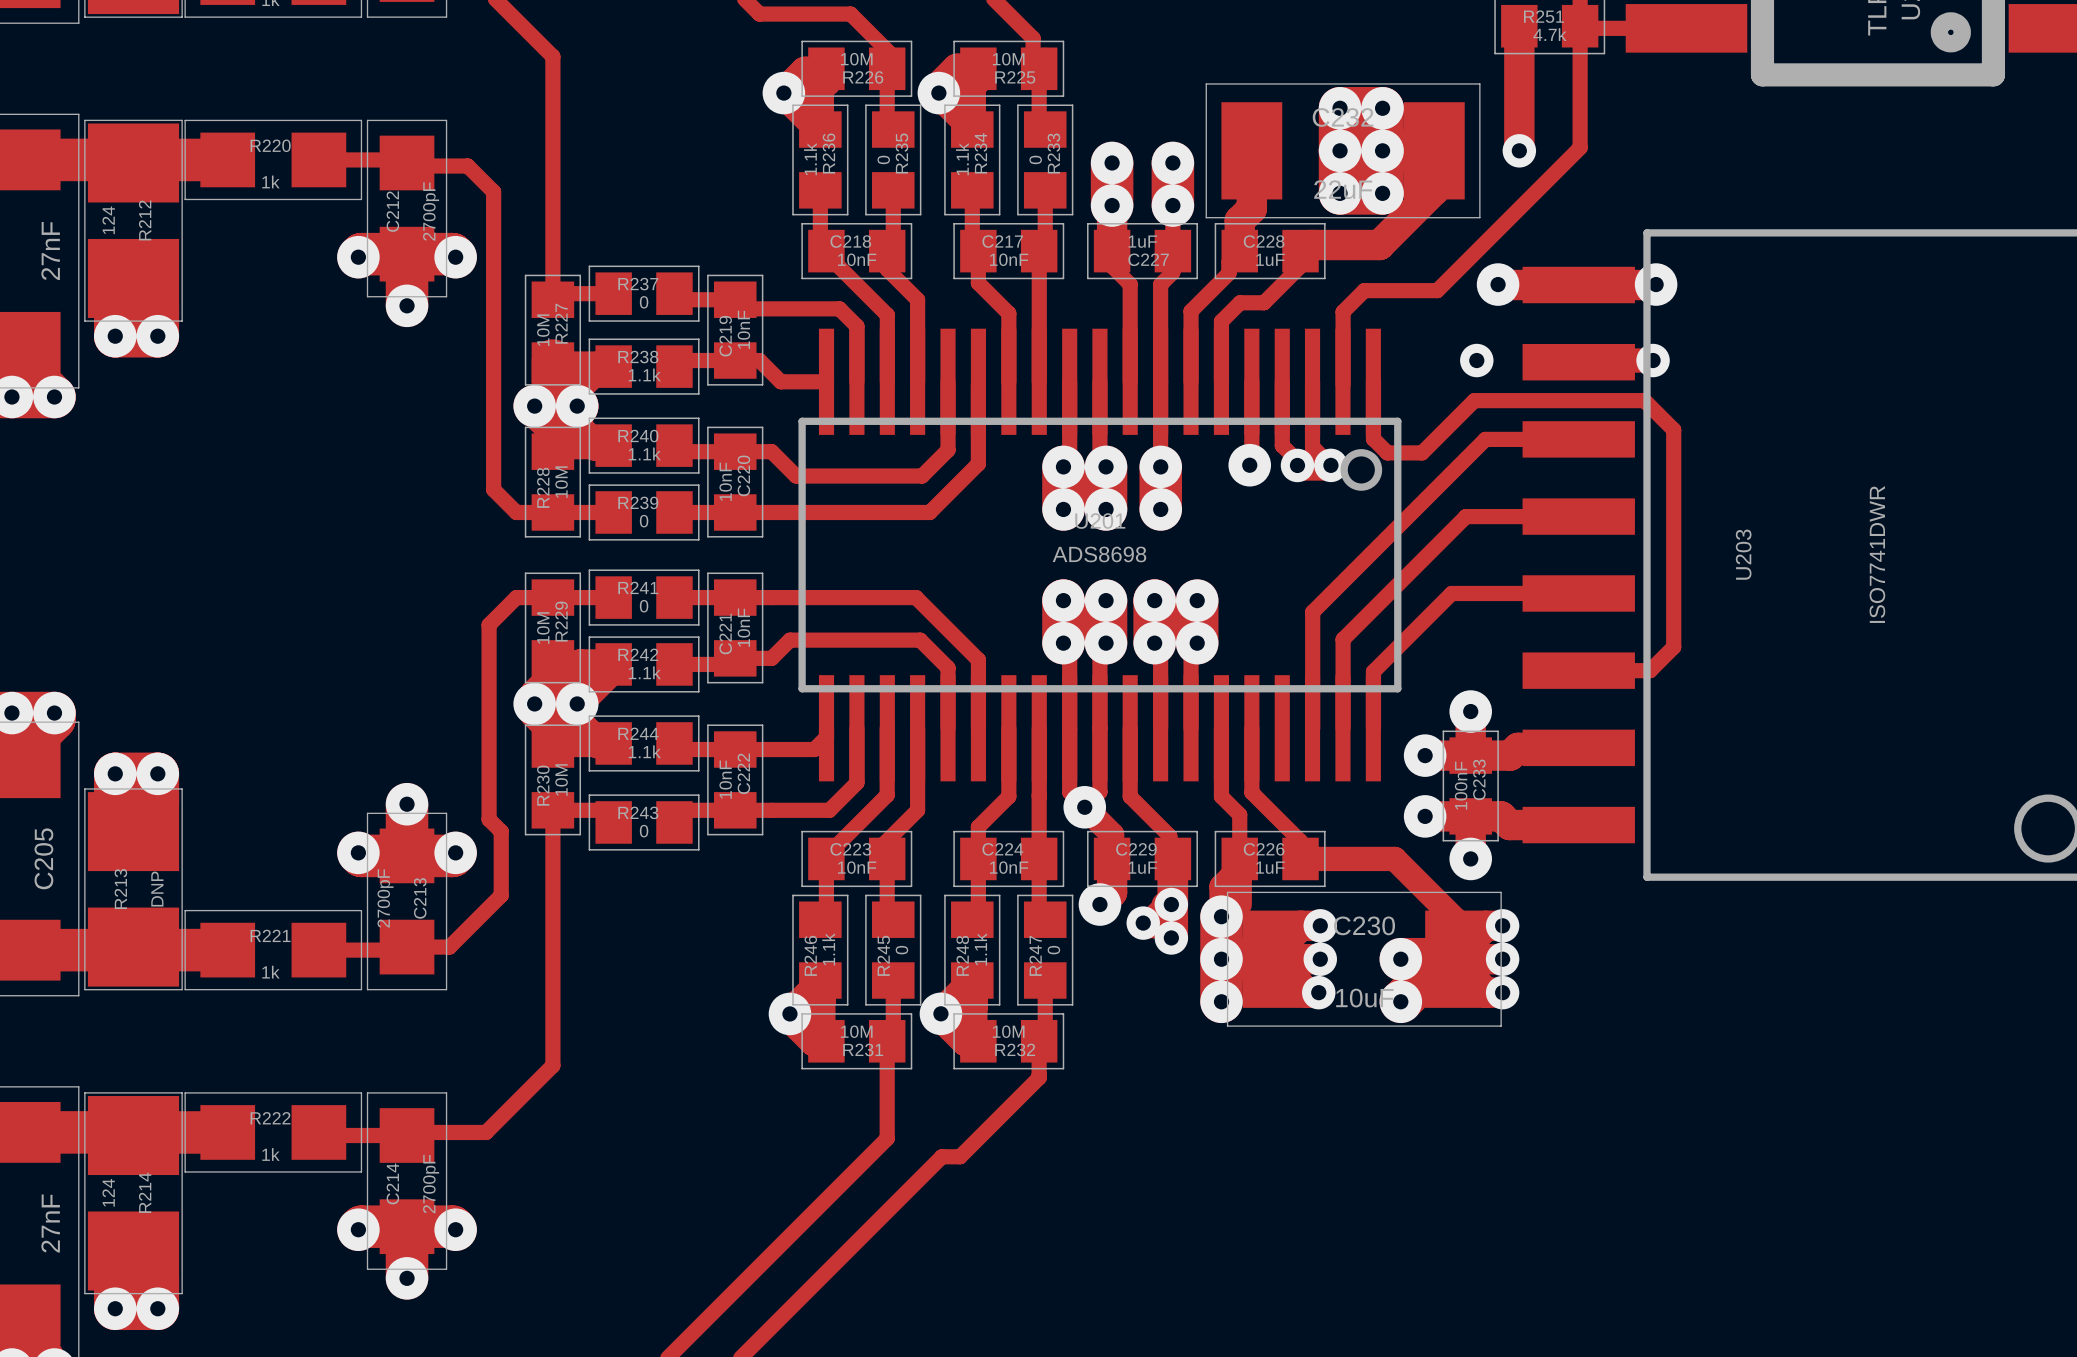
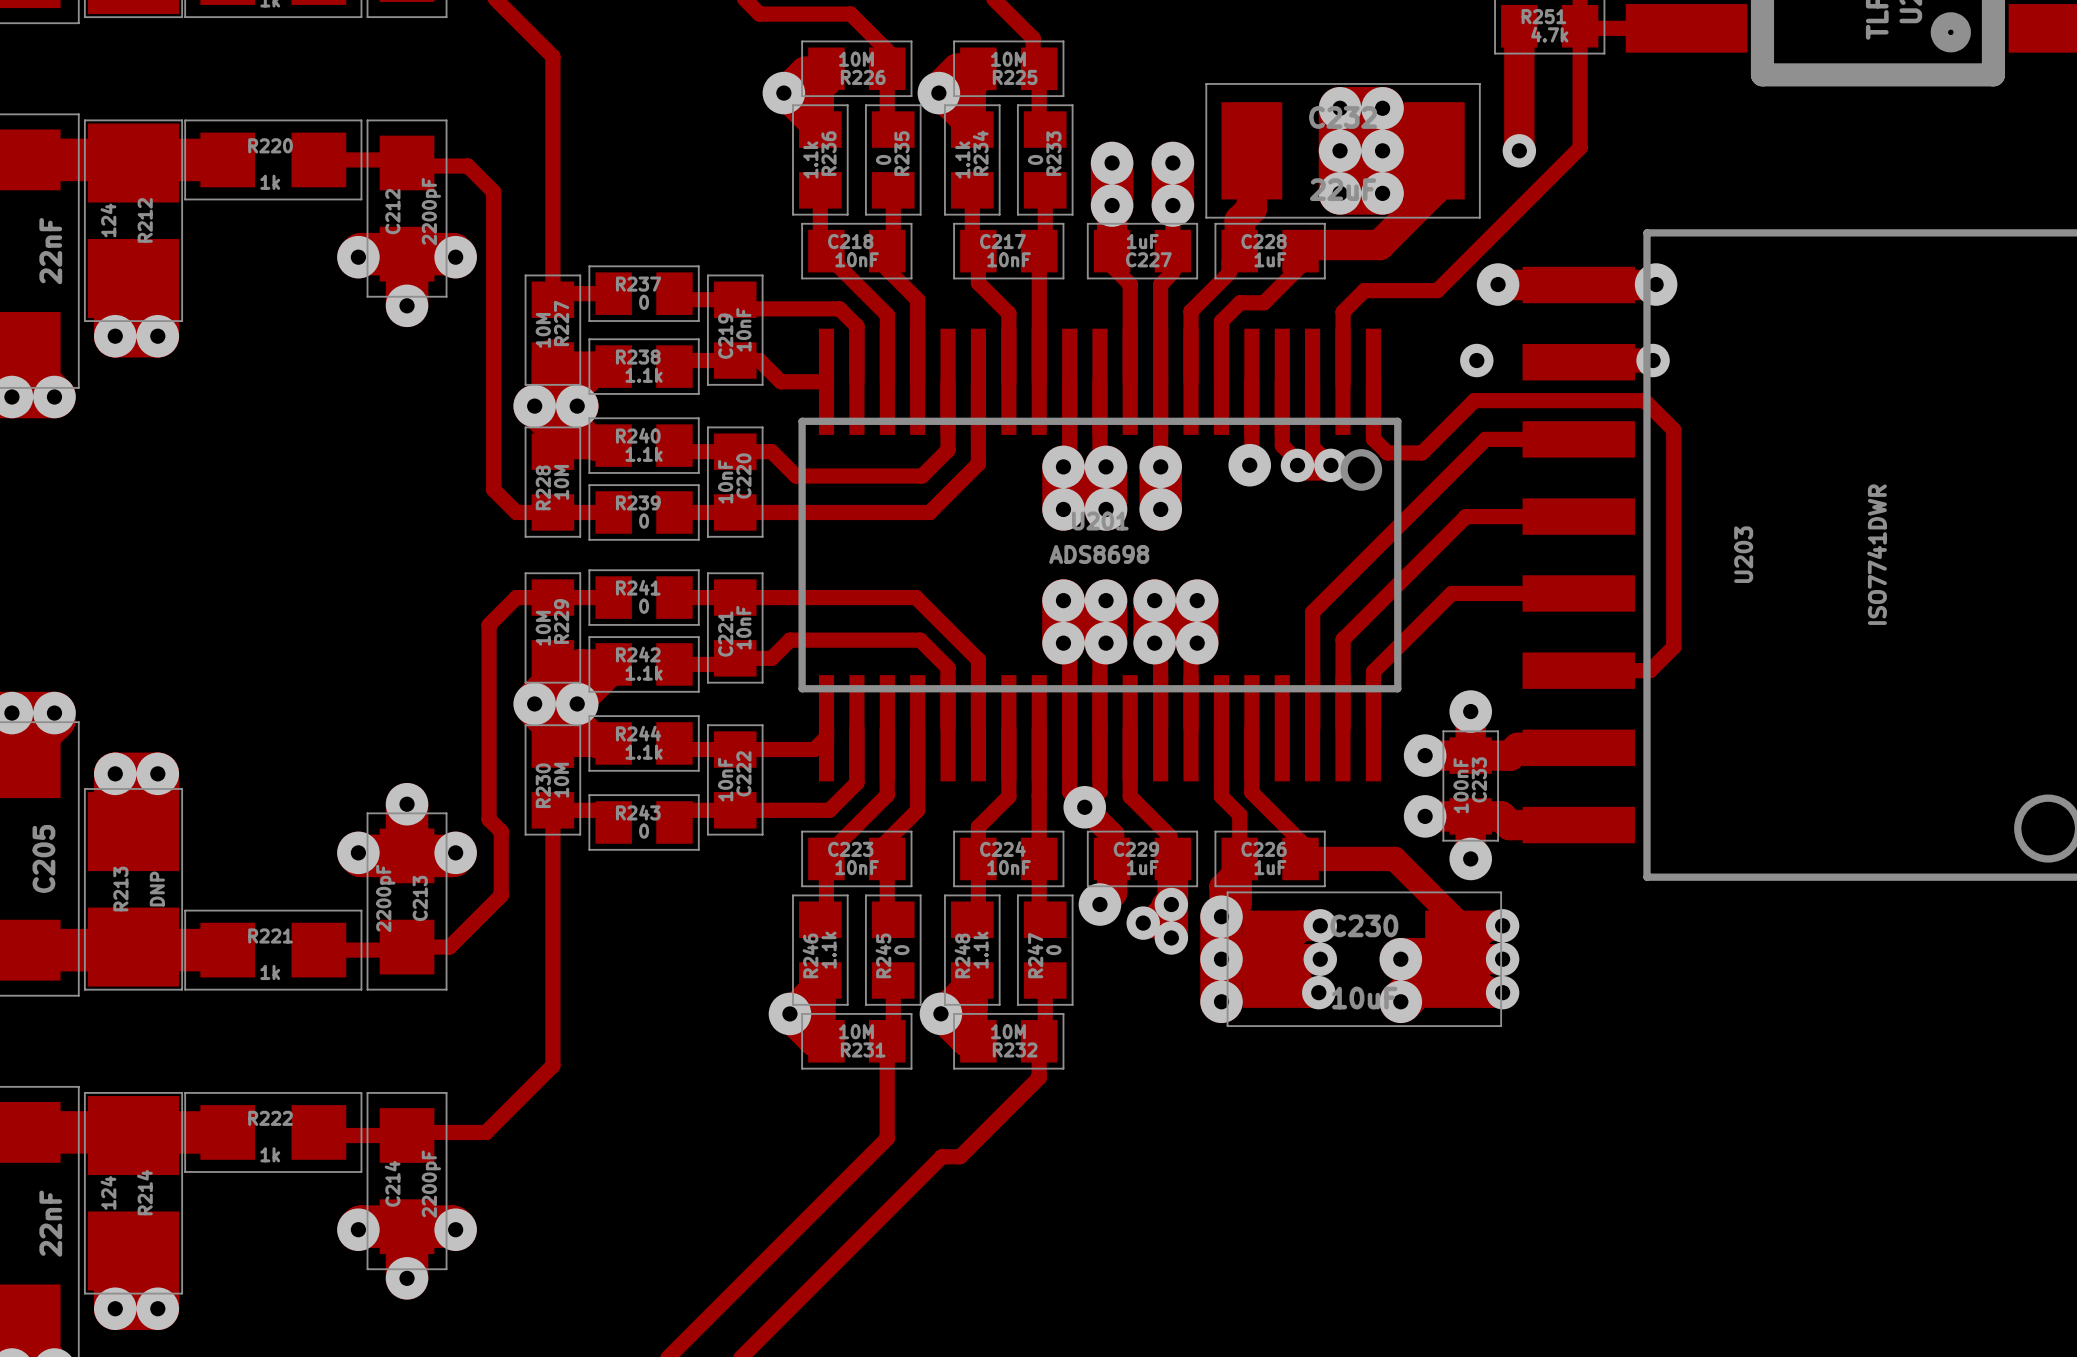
C212 value: 2700pF (431, 211) -> 2200pF (431, 211)
part value: 27nF (50, 250) -> 22nF (50, 251)
C213 value: 2700pF (385, 898) -> 2200pF (385, 898)
C214 value: 2700pF (431, 1184) -> 2200pF (431, 1184)
part value: 27nF (50, 1223) -> 22nF (50, 1223)

